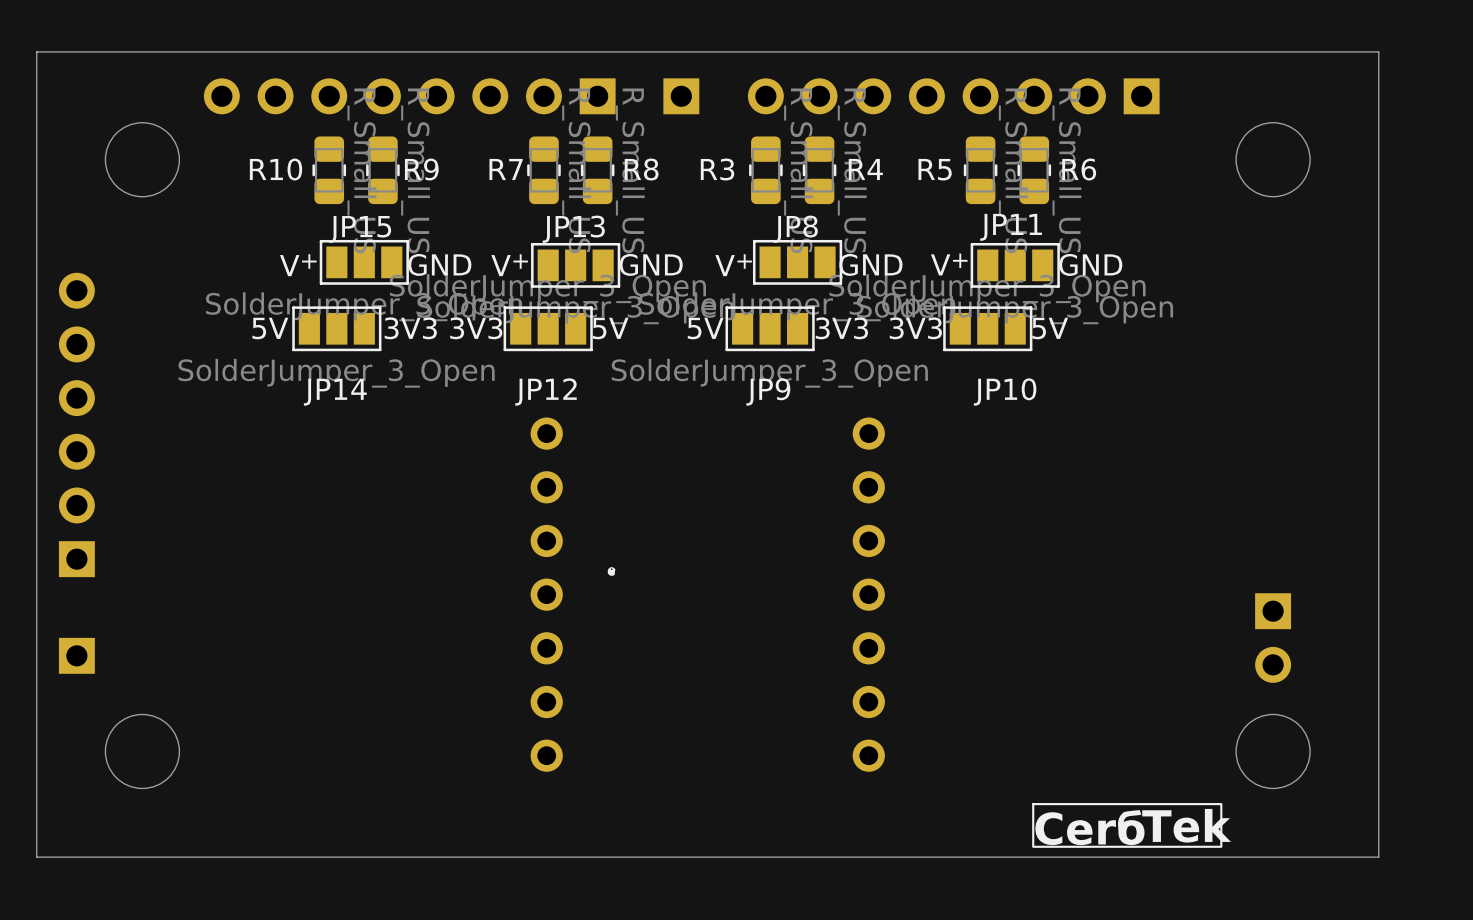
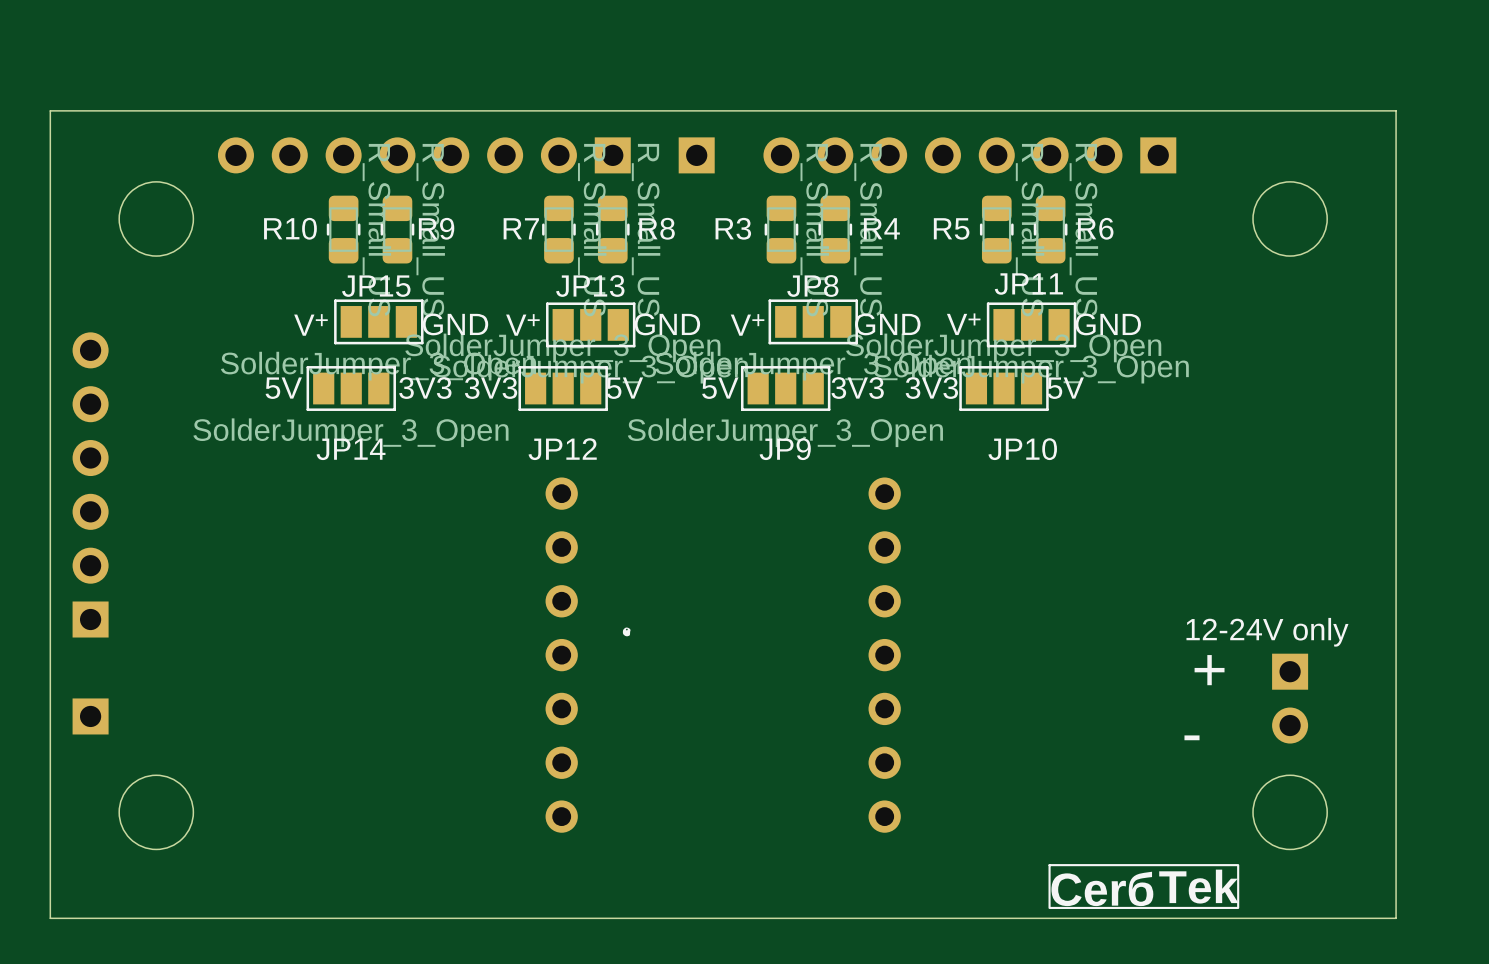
text: none -> 12-24V only (1267, 632)
text: none -> + (1209, 670)
text: none -> - (1191, 737)

